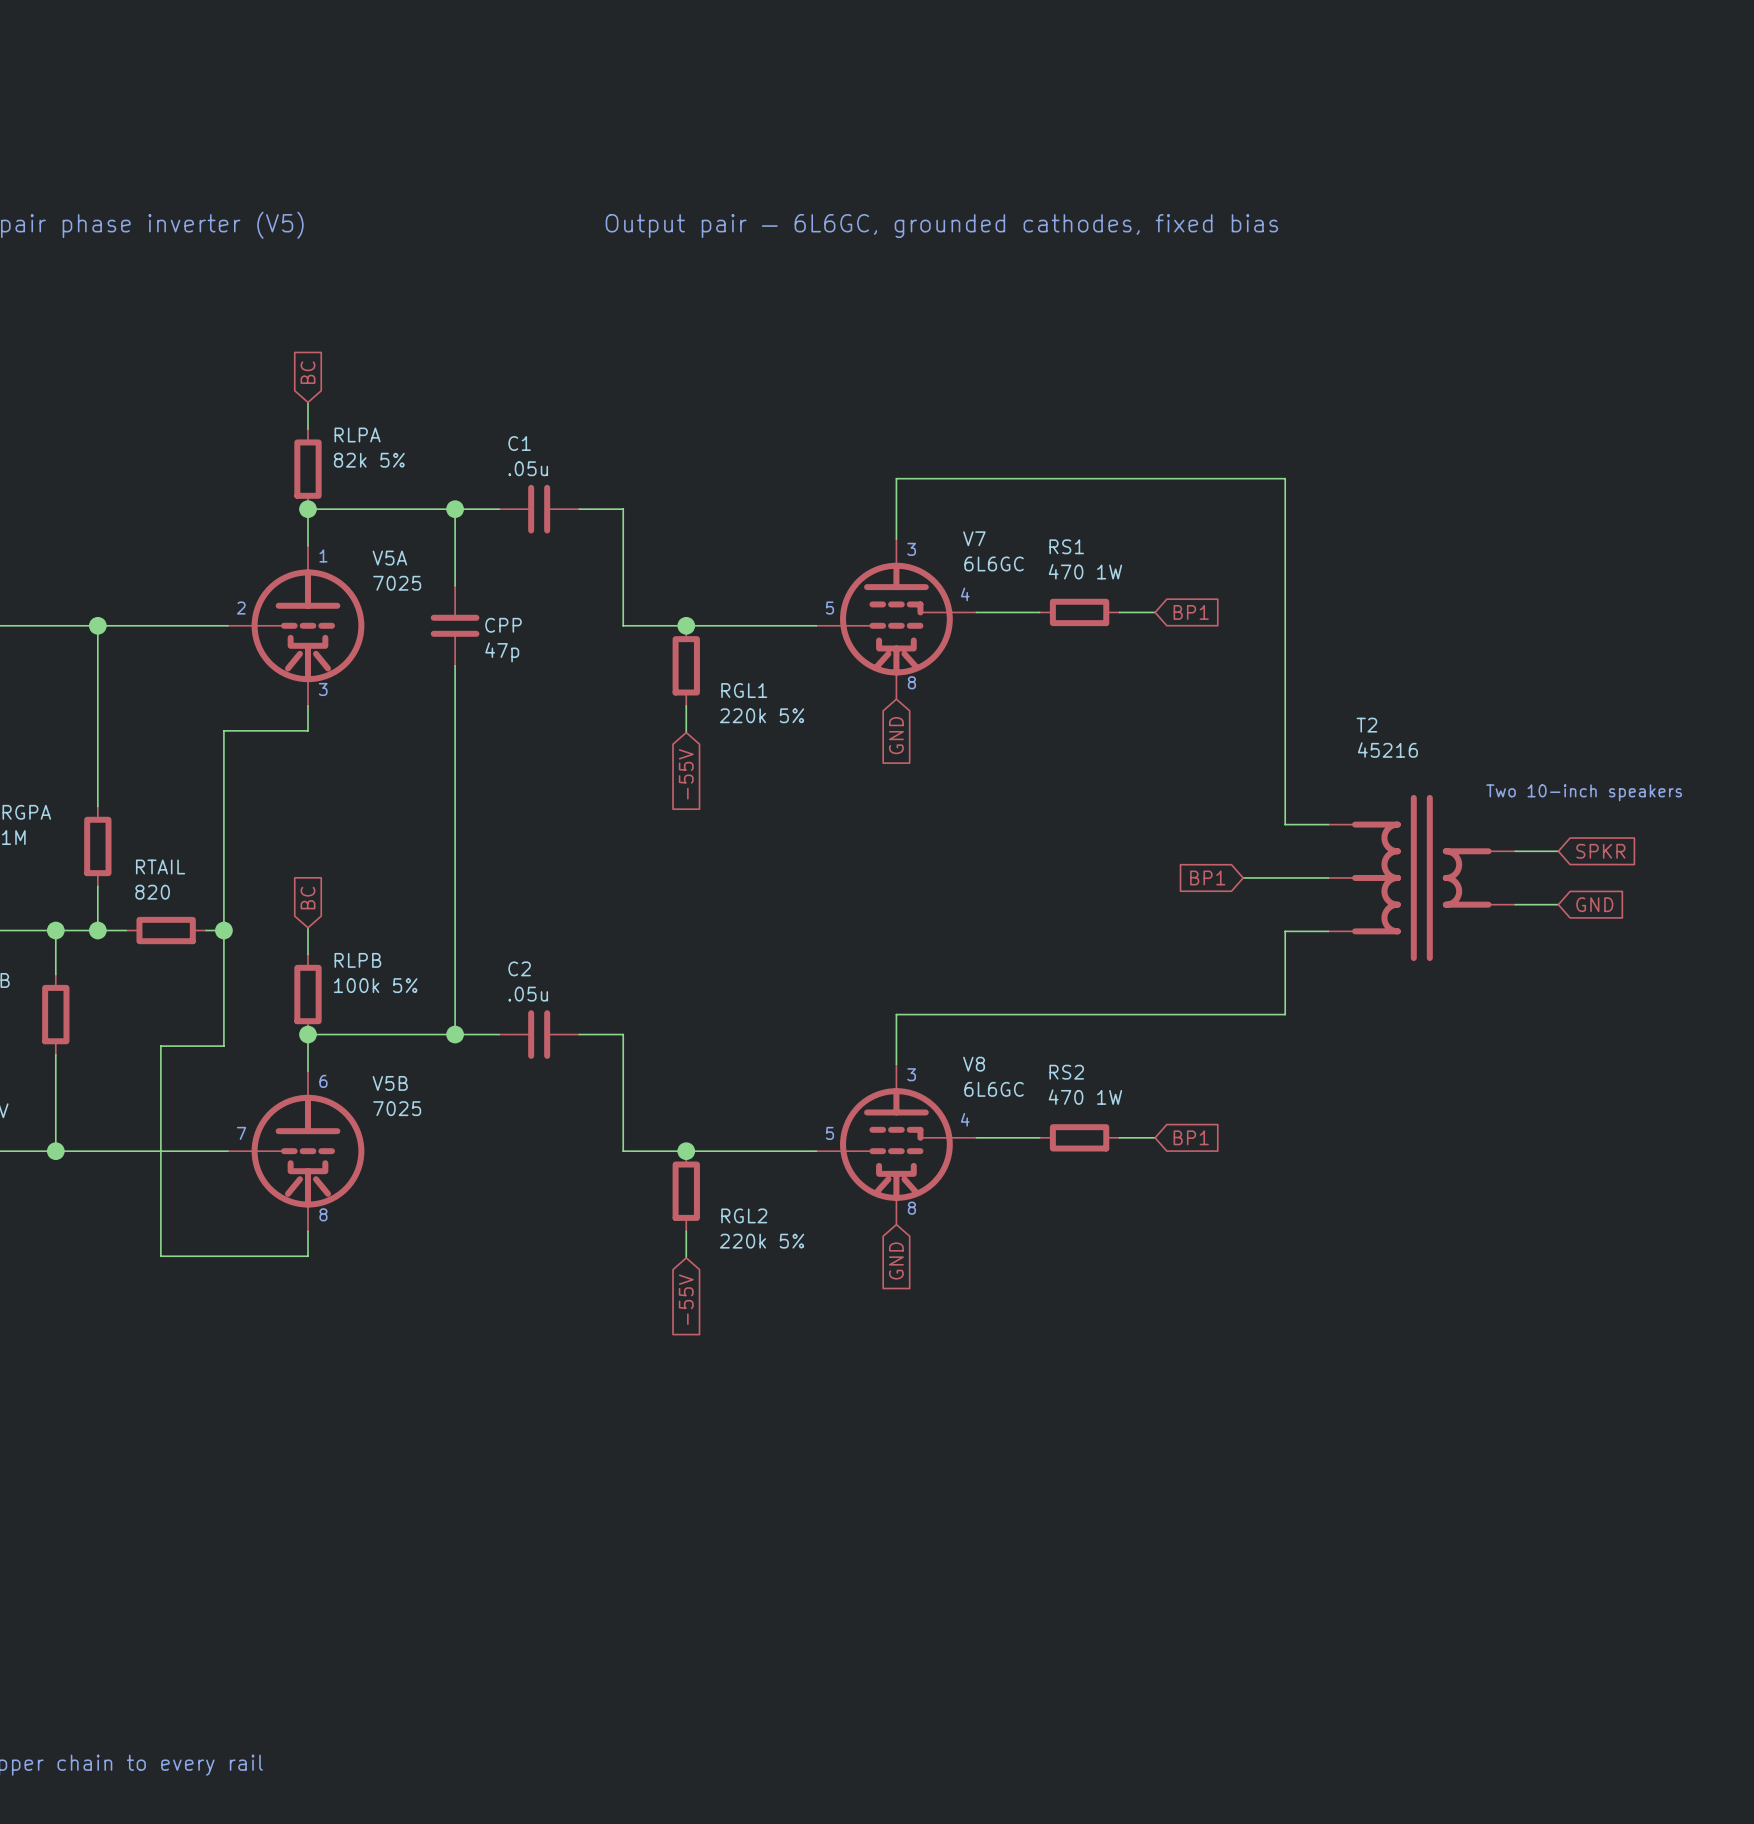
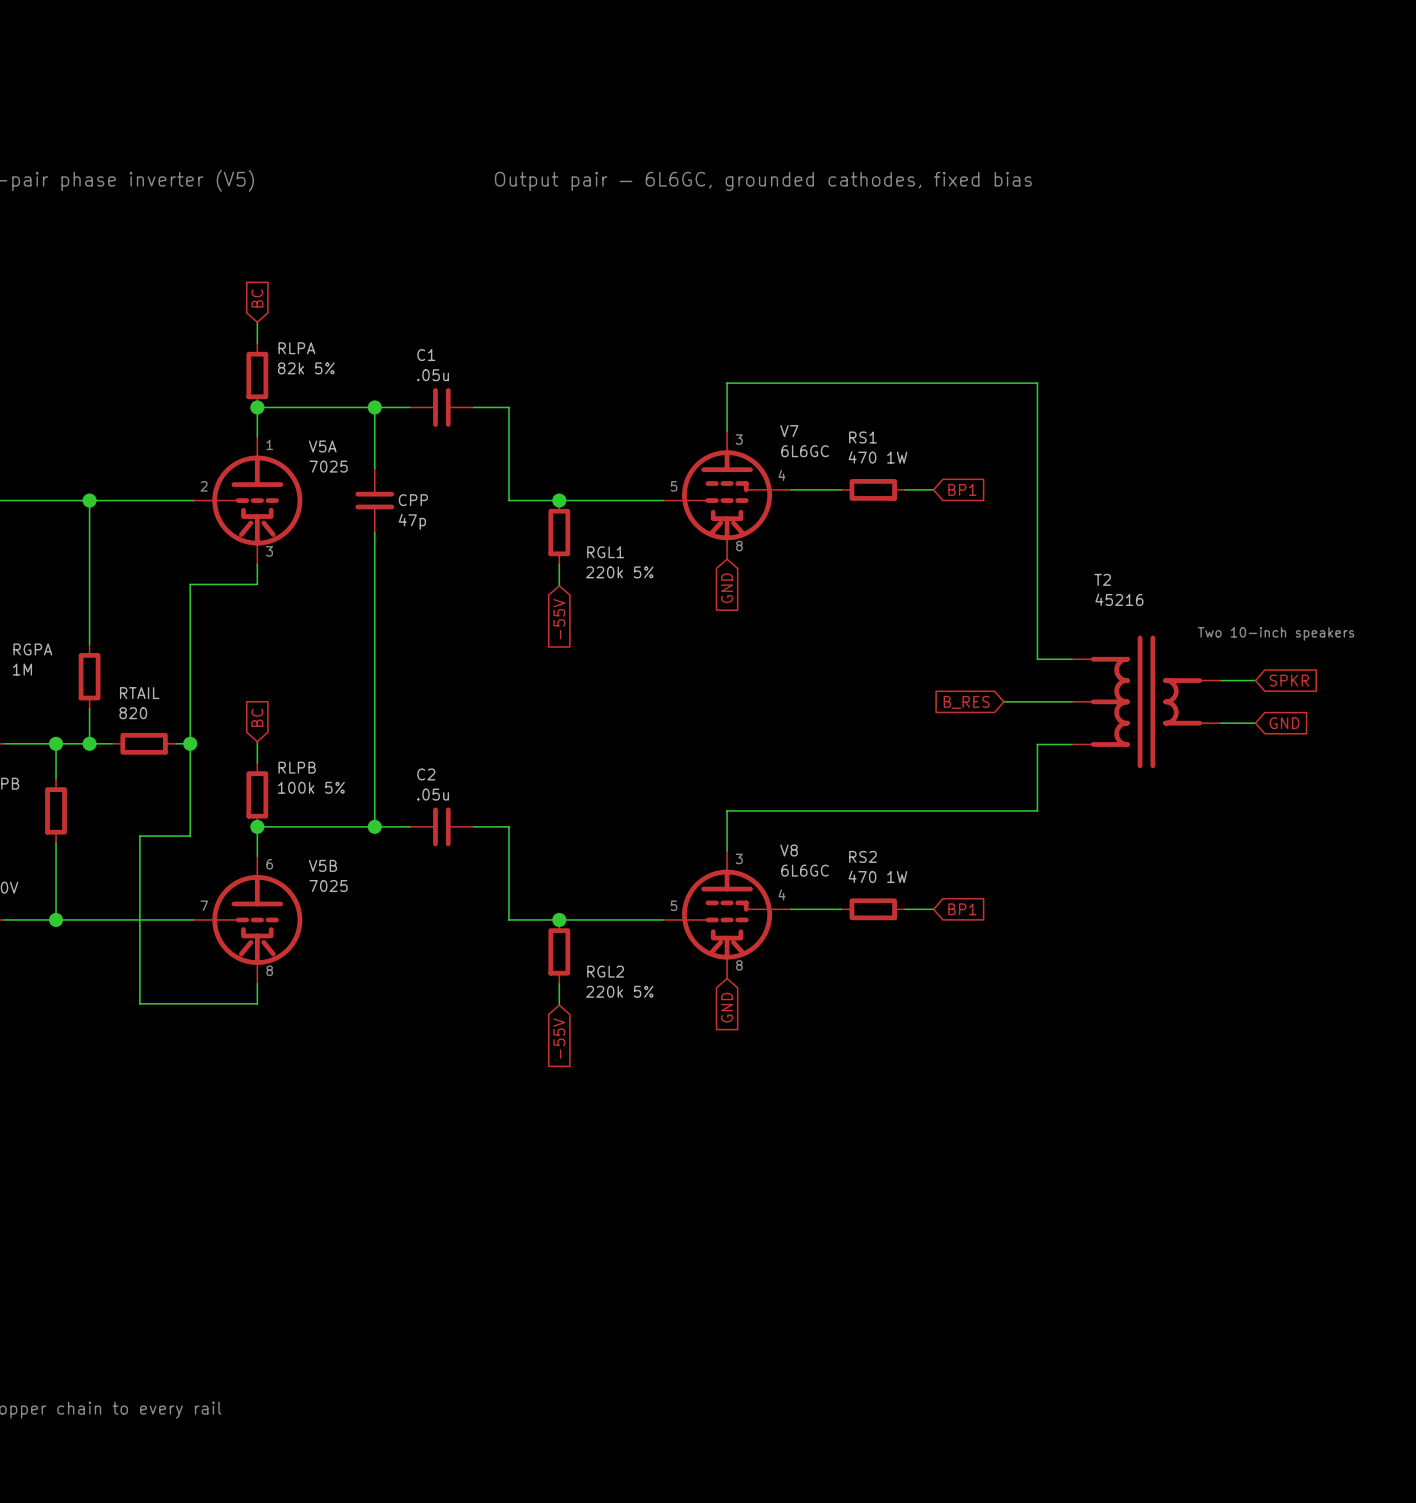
global label: BP1 (1207, 877) -> B_RES (966, 702)

